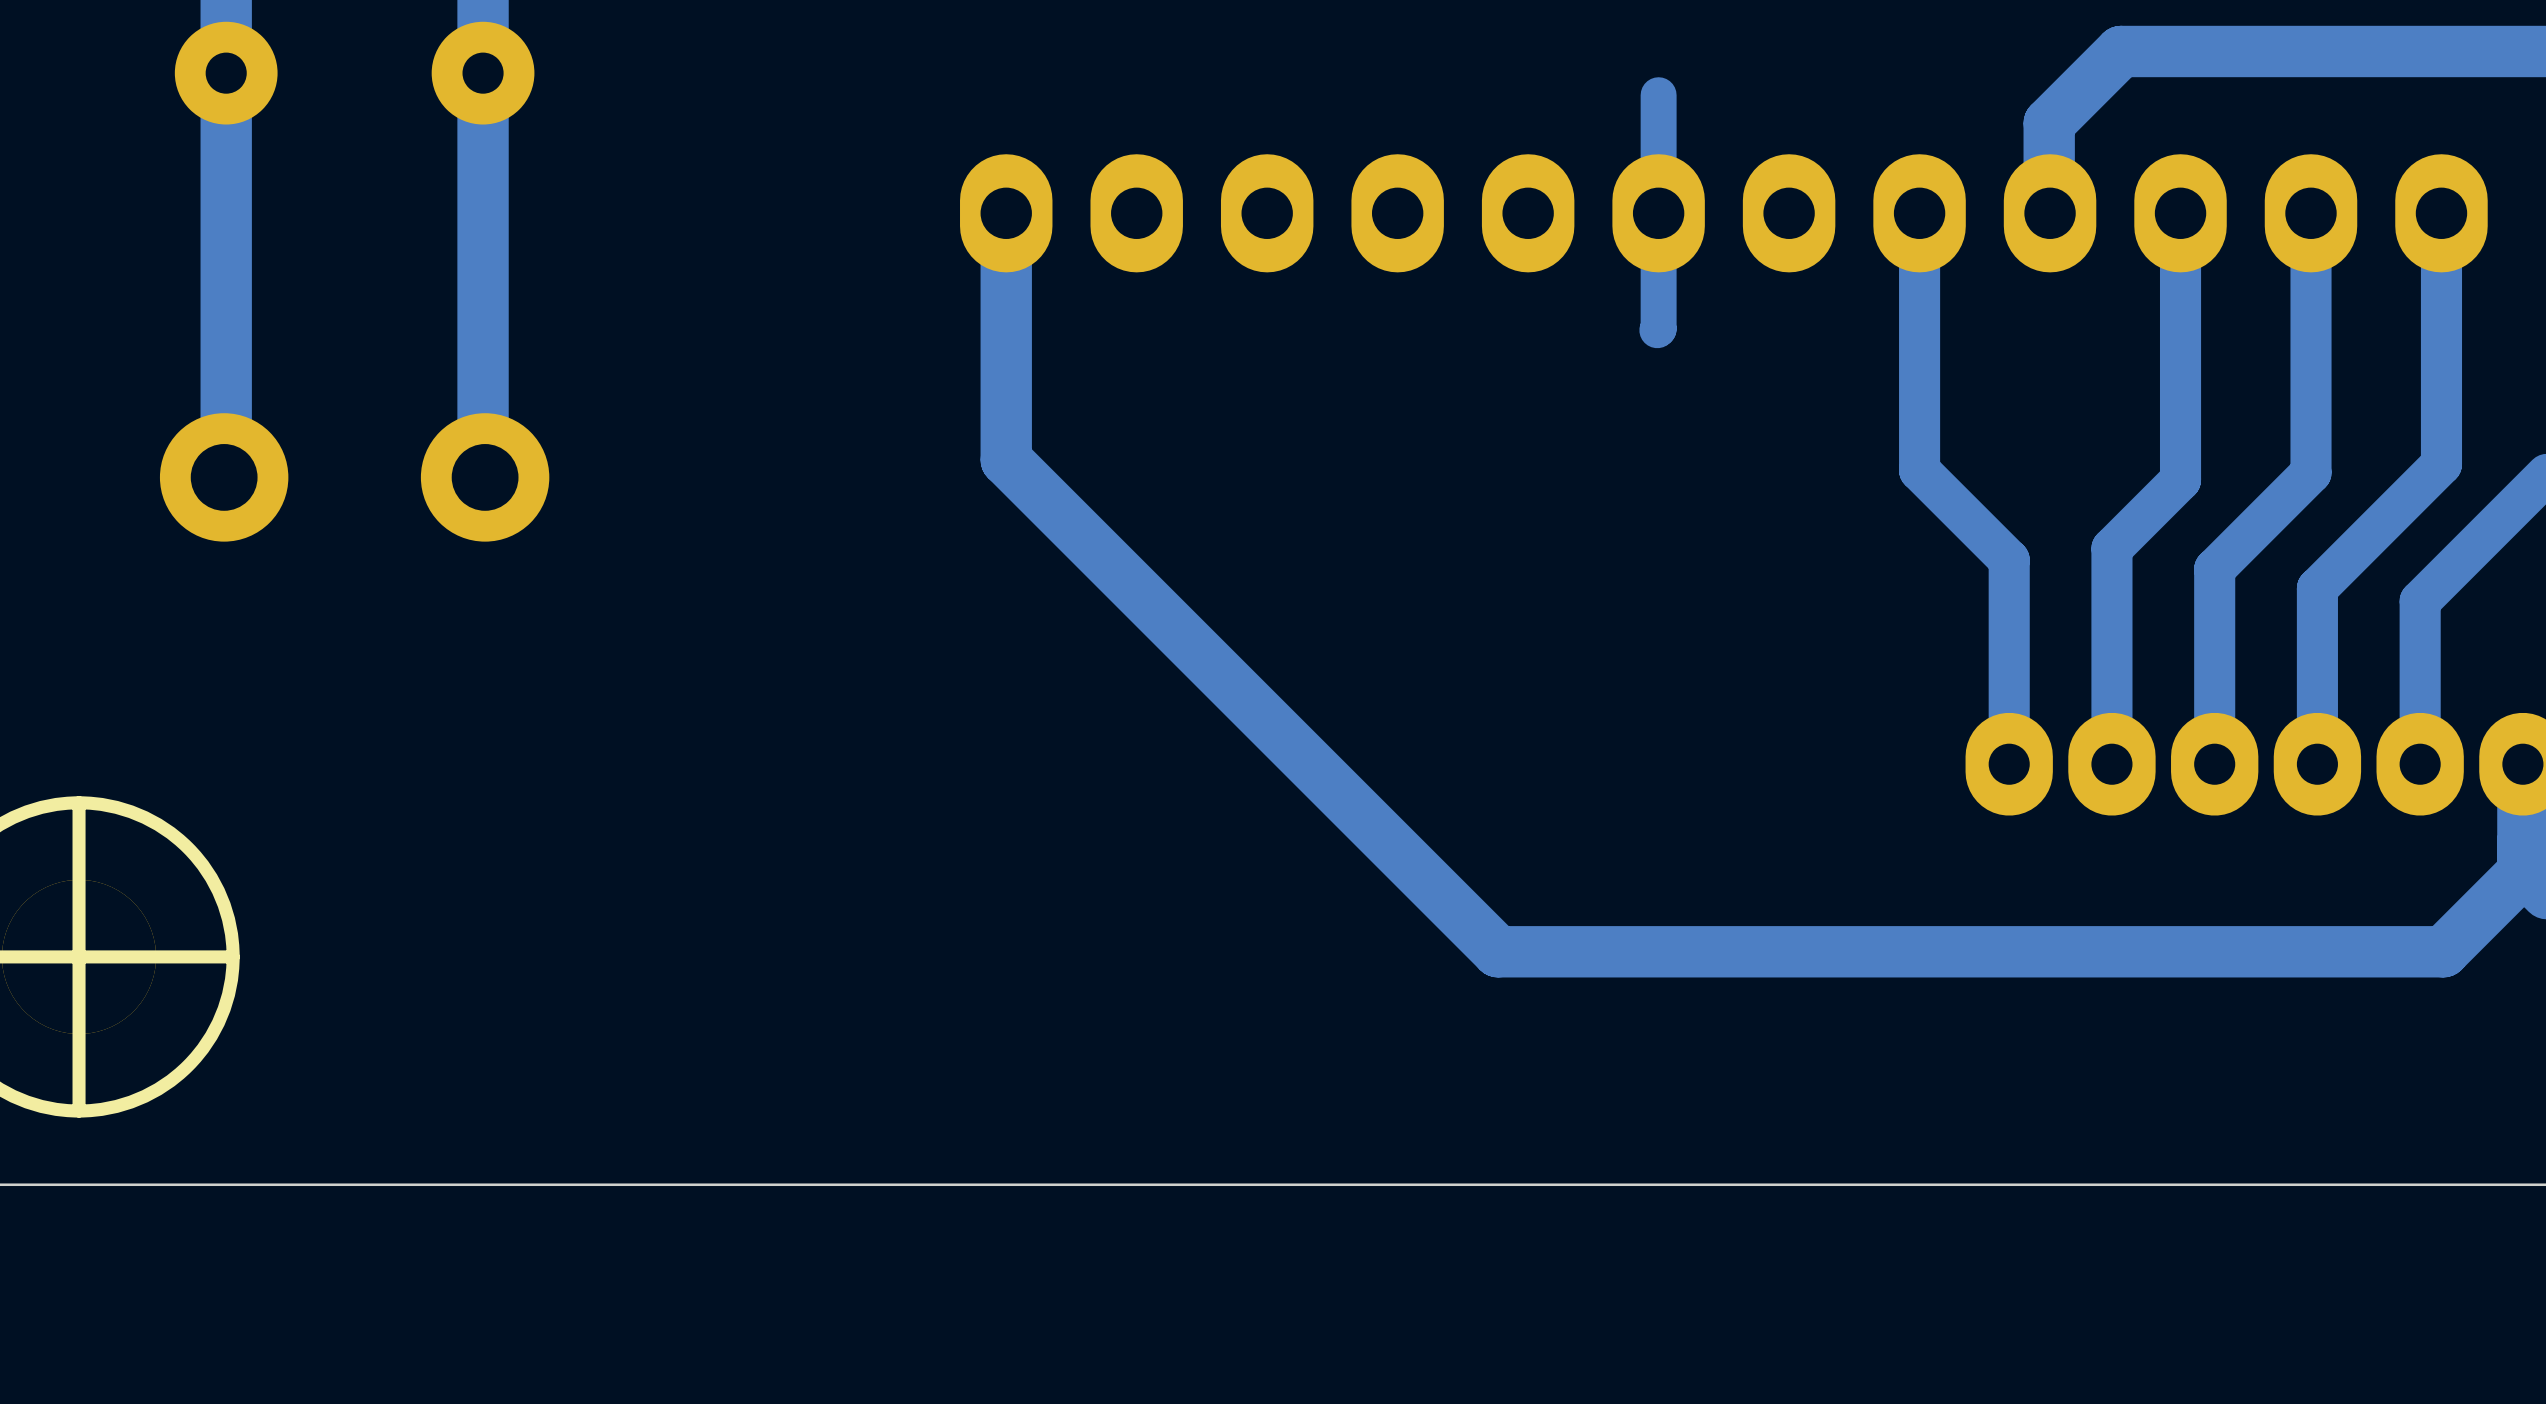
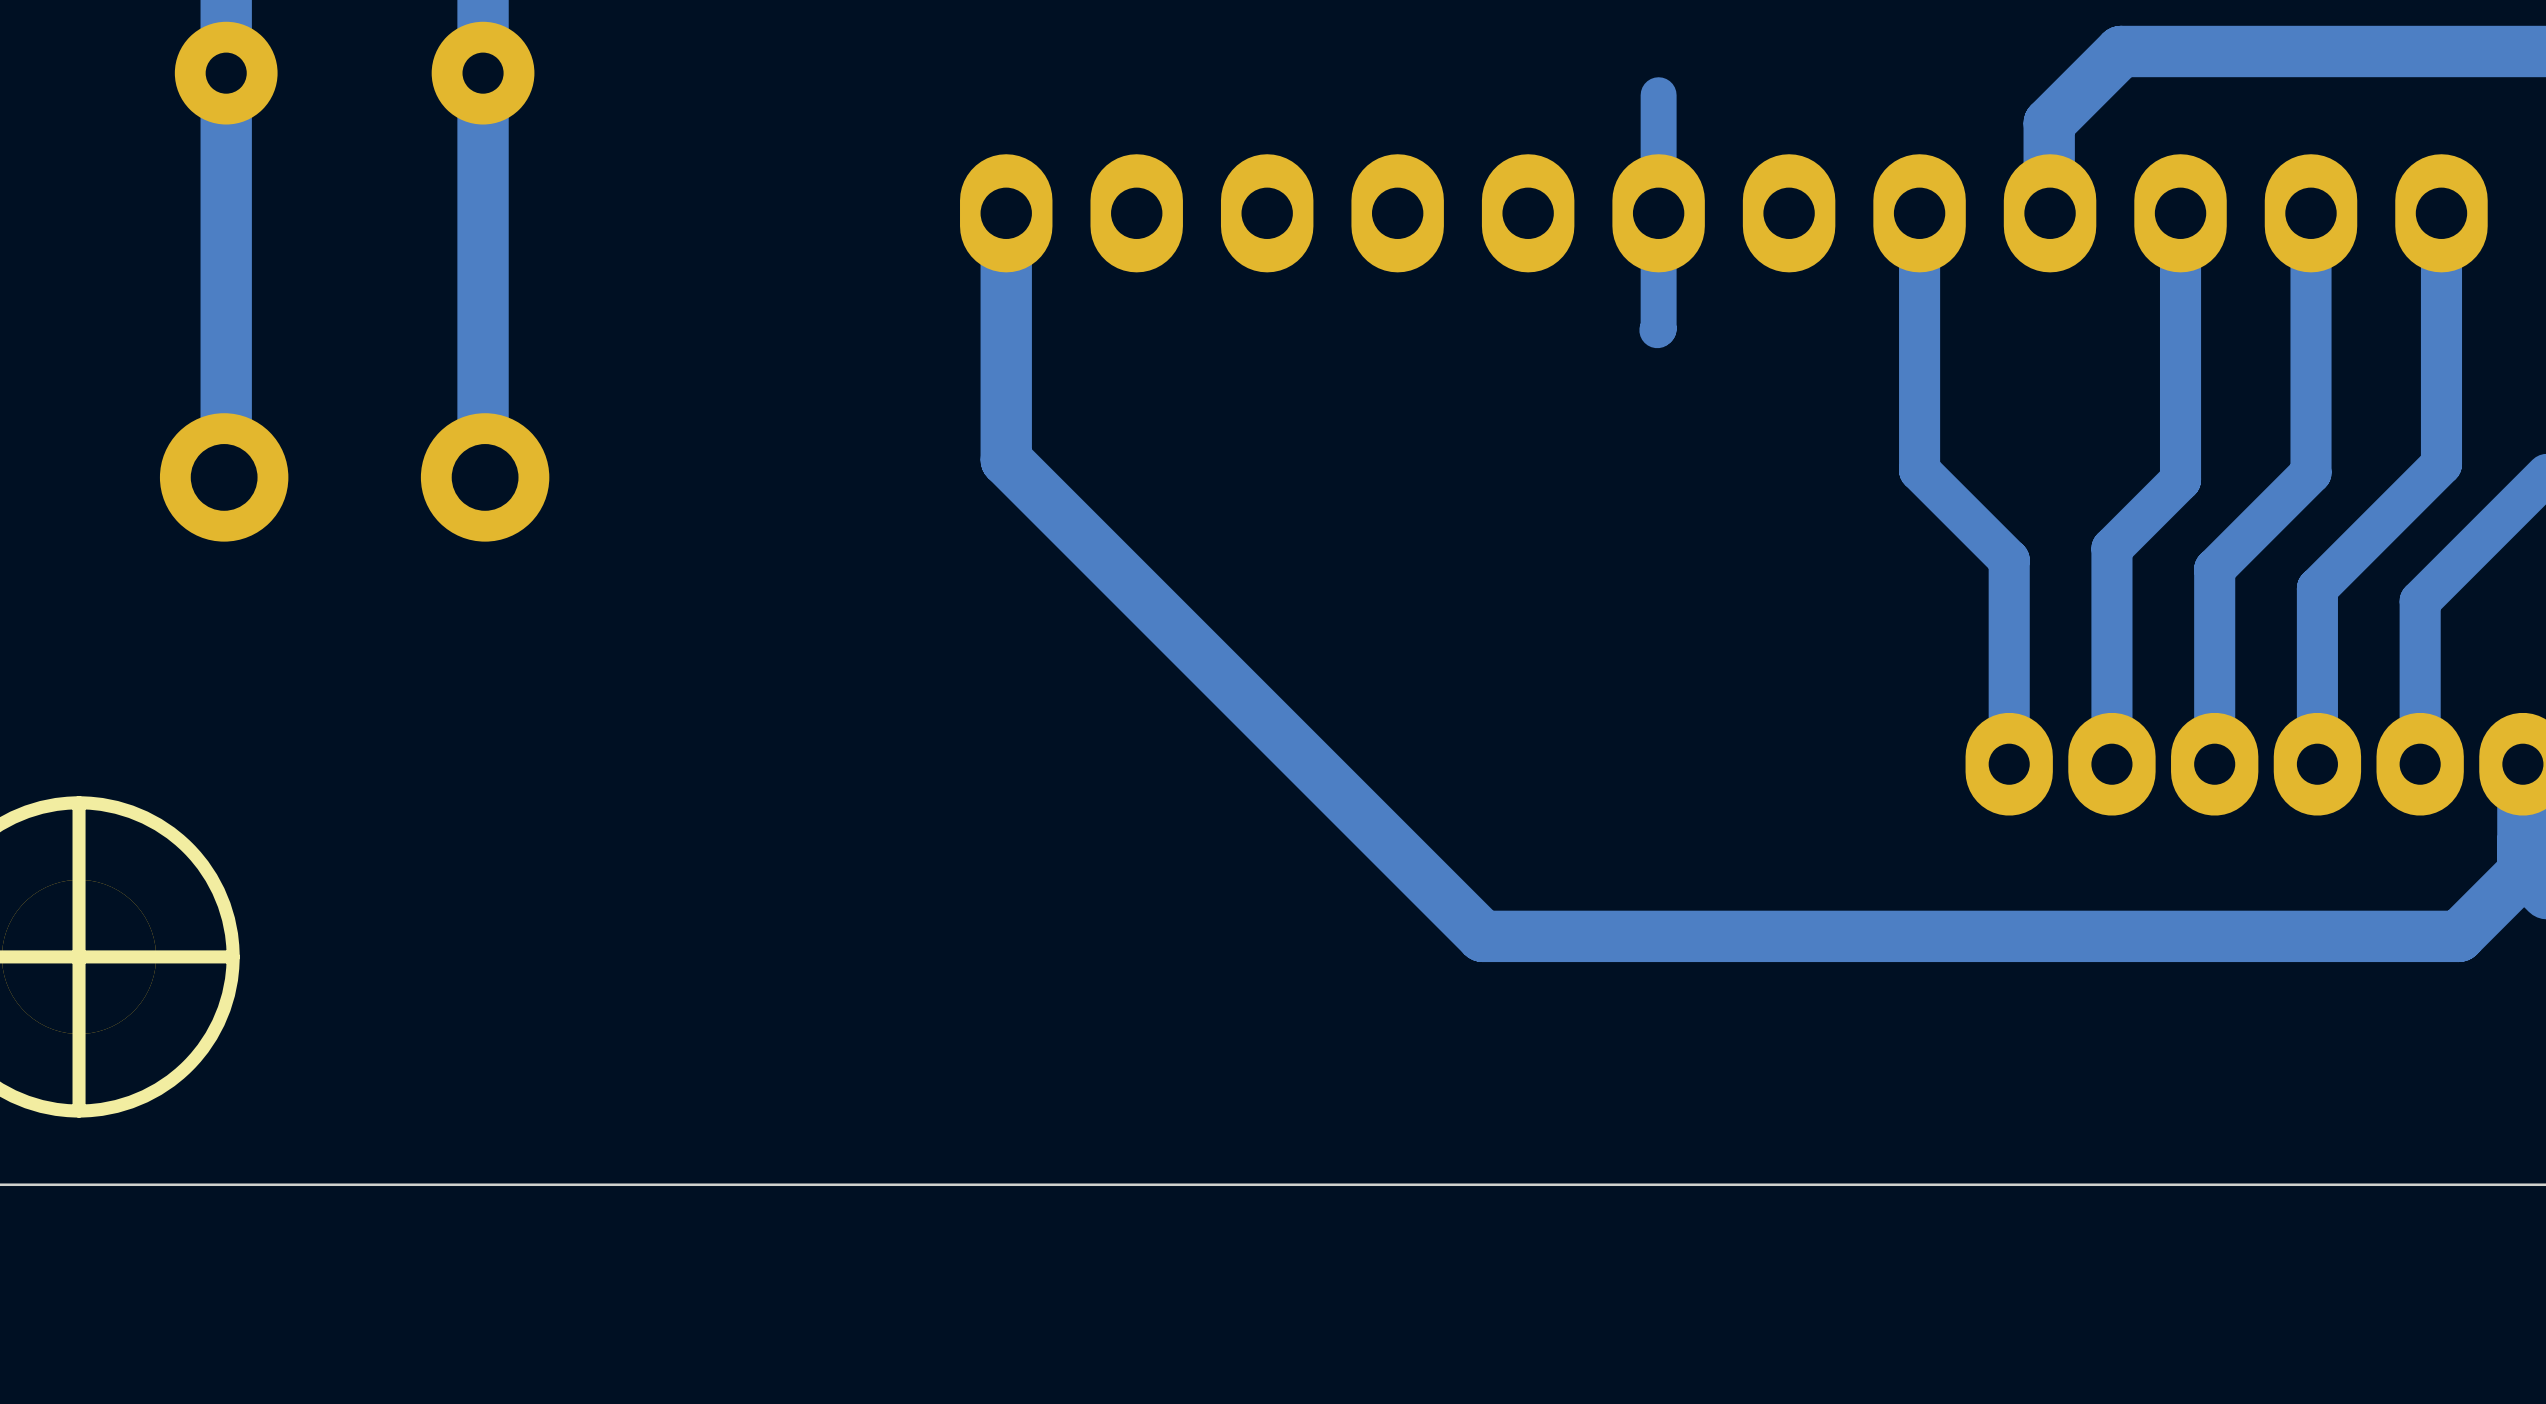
track: (2458, 936) (2443, 951) (1498, 951) (1482, 936) -> (2458, 936) (1482, 936)

